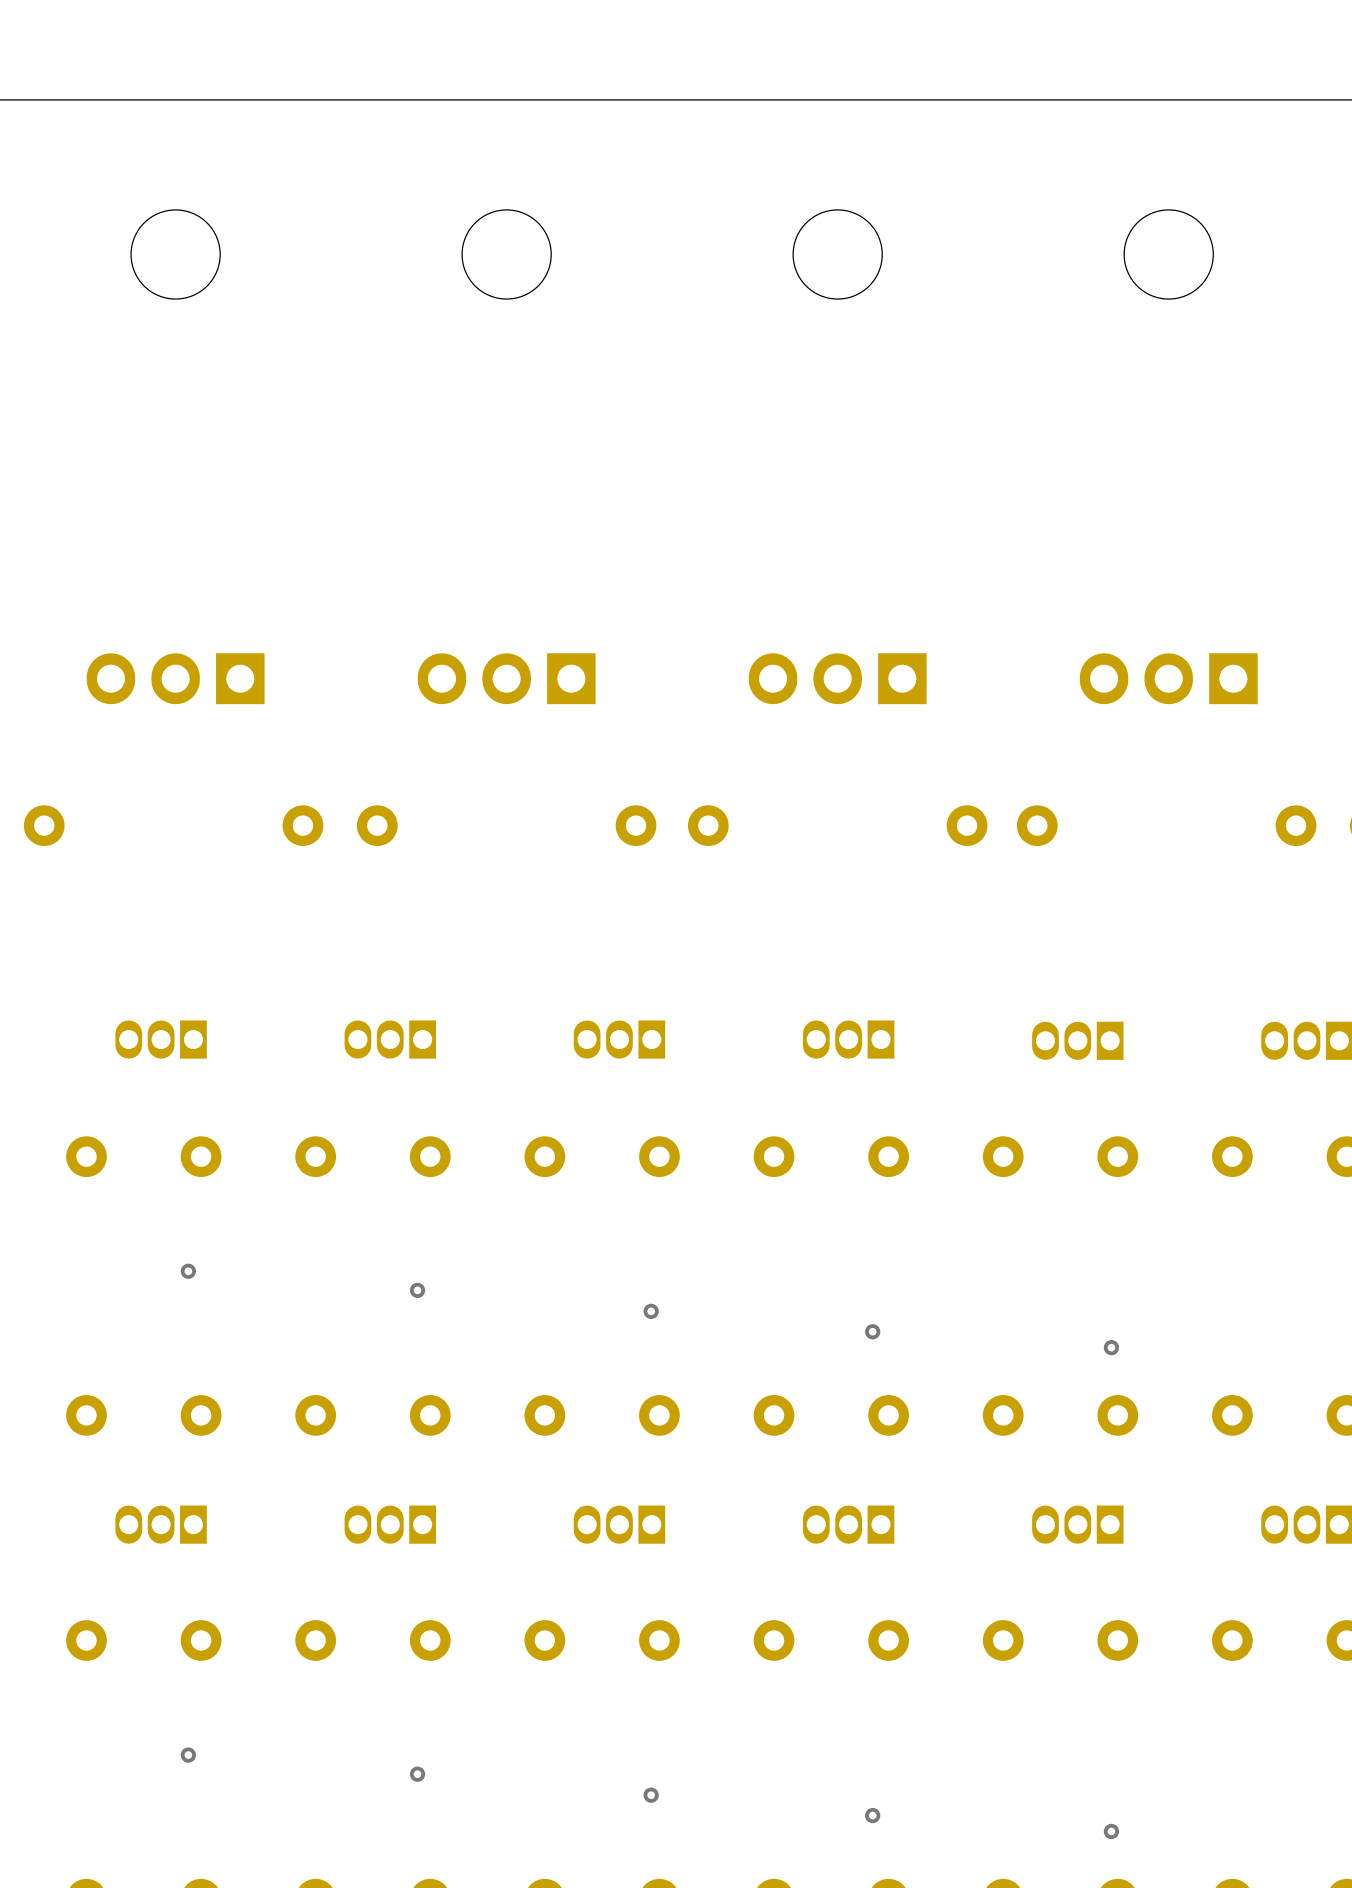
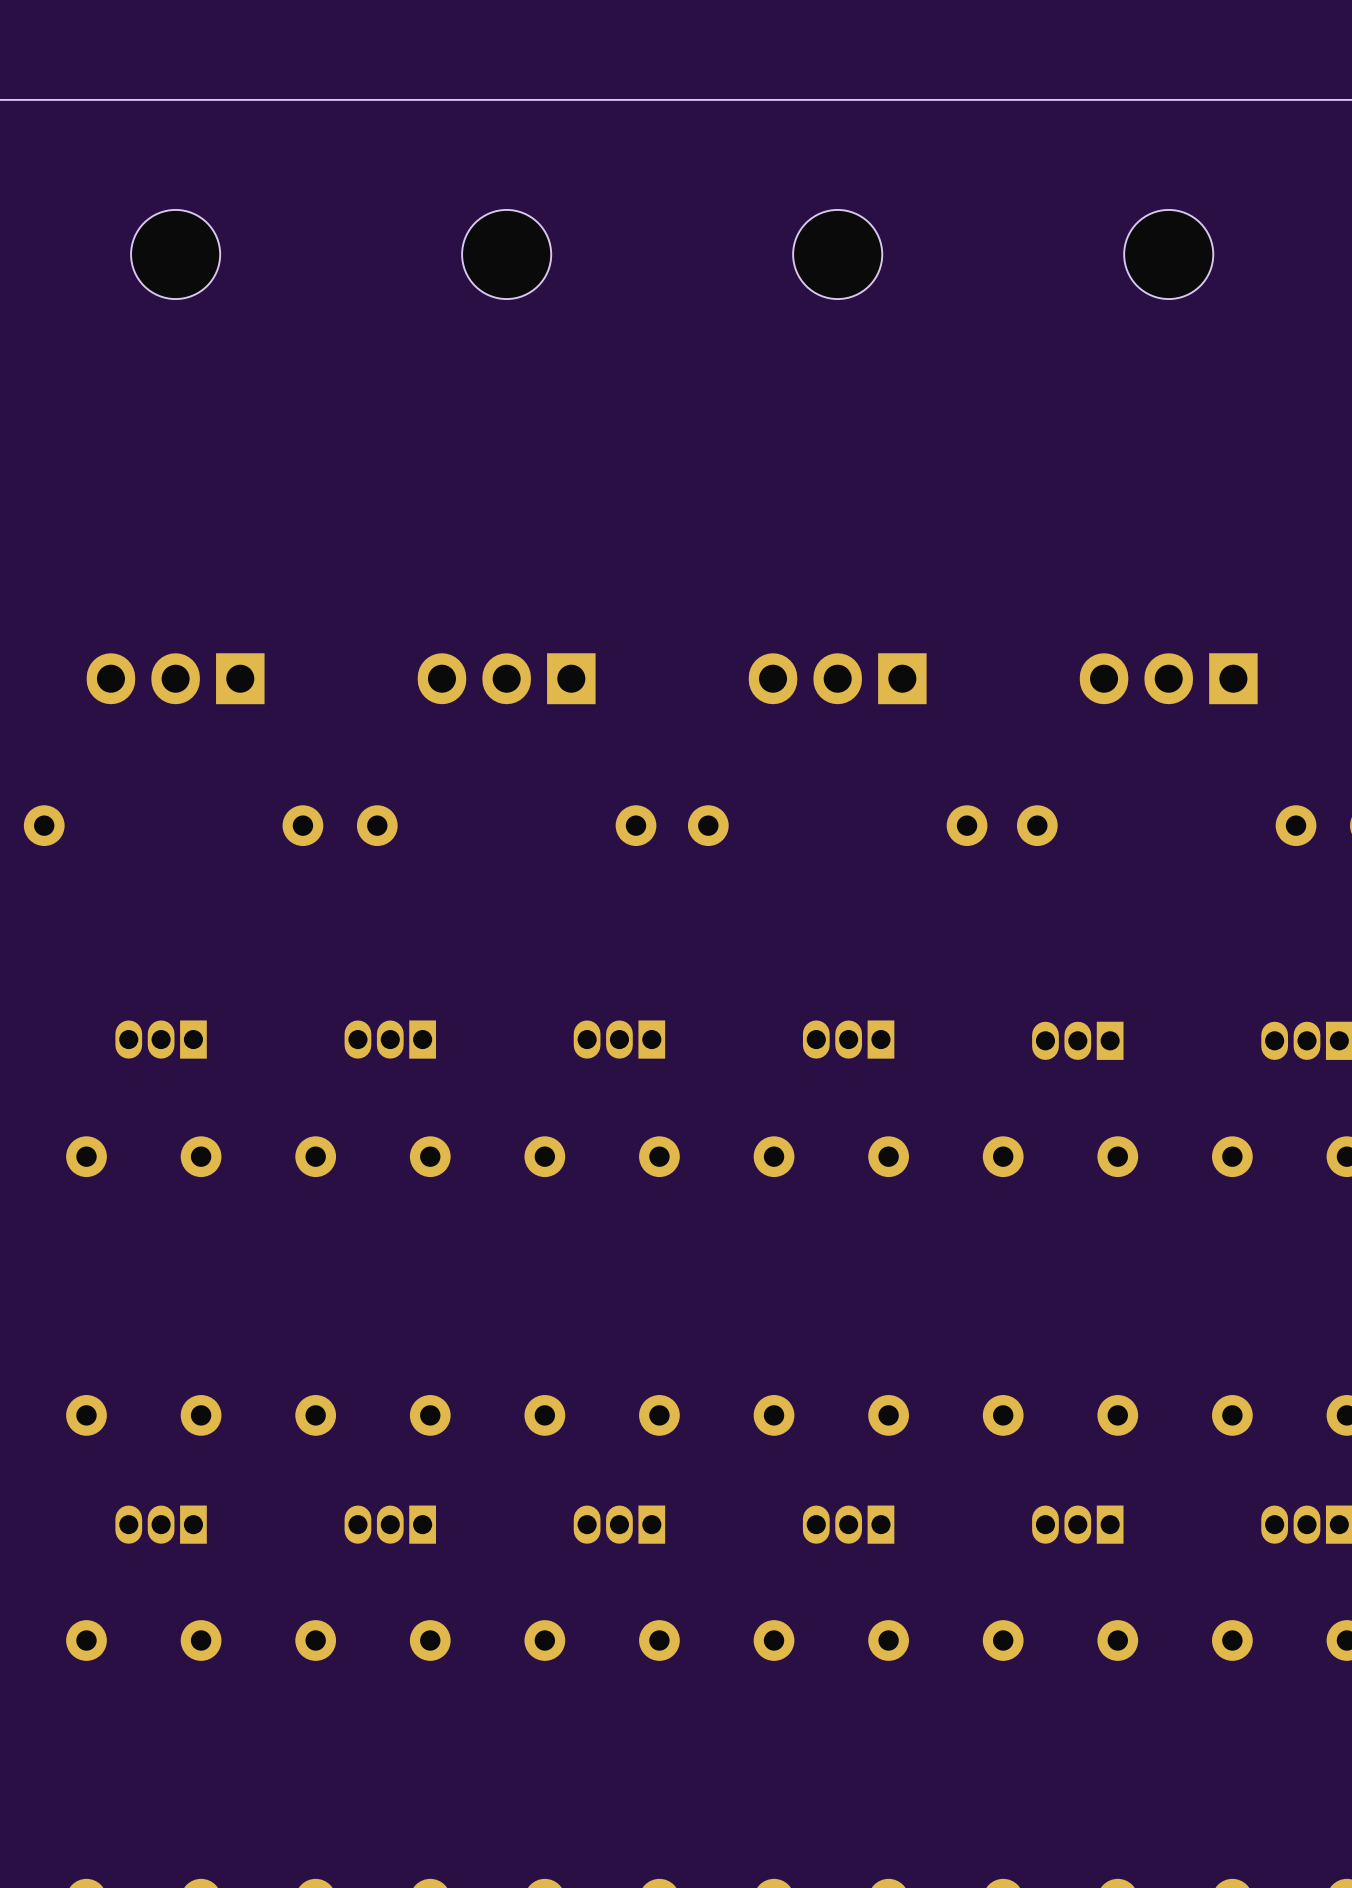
via: (188, 1271) -> none
via: (417, 1290) -> none
via: (651, 1311) -> none
via: (872, 1331) -> none
via: (1111, 1347) -> none
via: (188, 1755) -> none
via: (417, 1774) -> none
via: (651, 1795) -> none
via: (872, 1815) -> none
via: (1111, 1831) -> none

